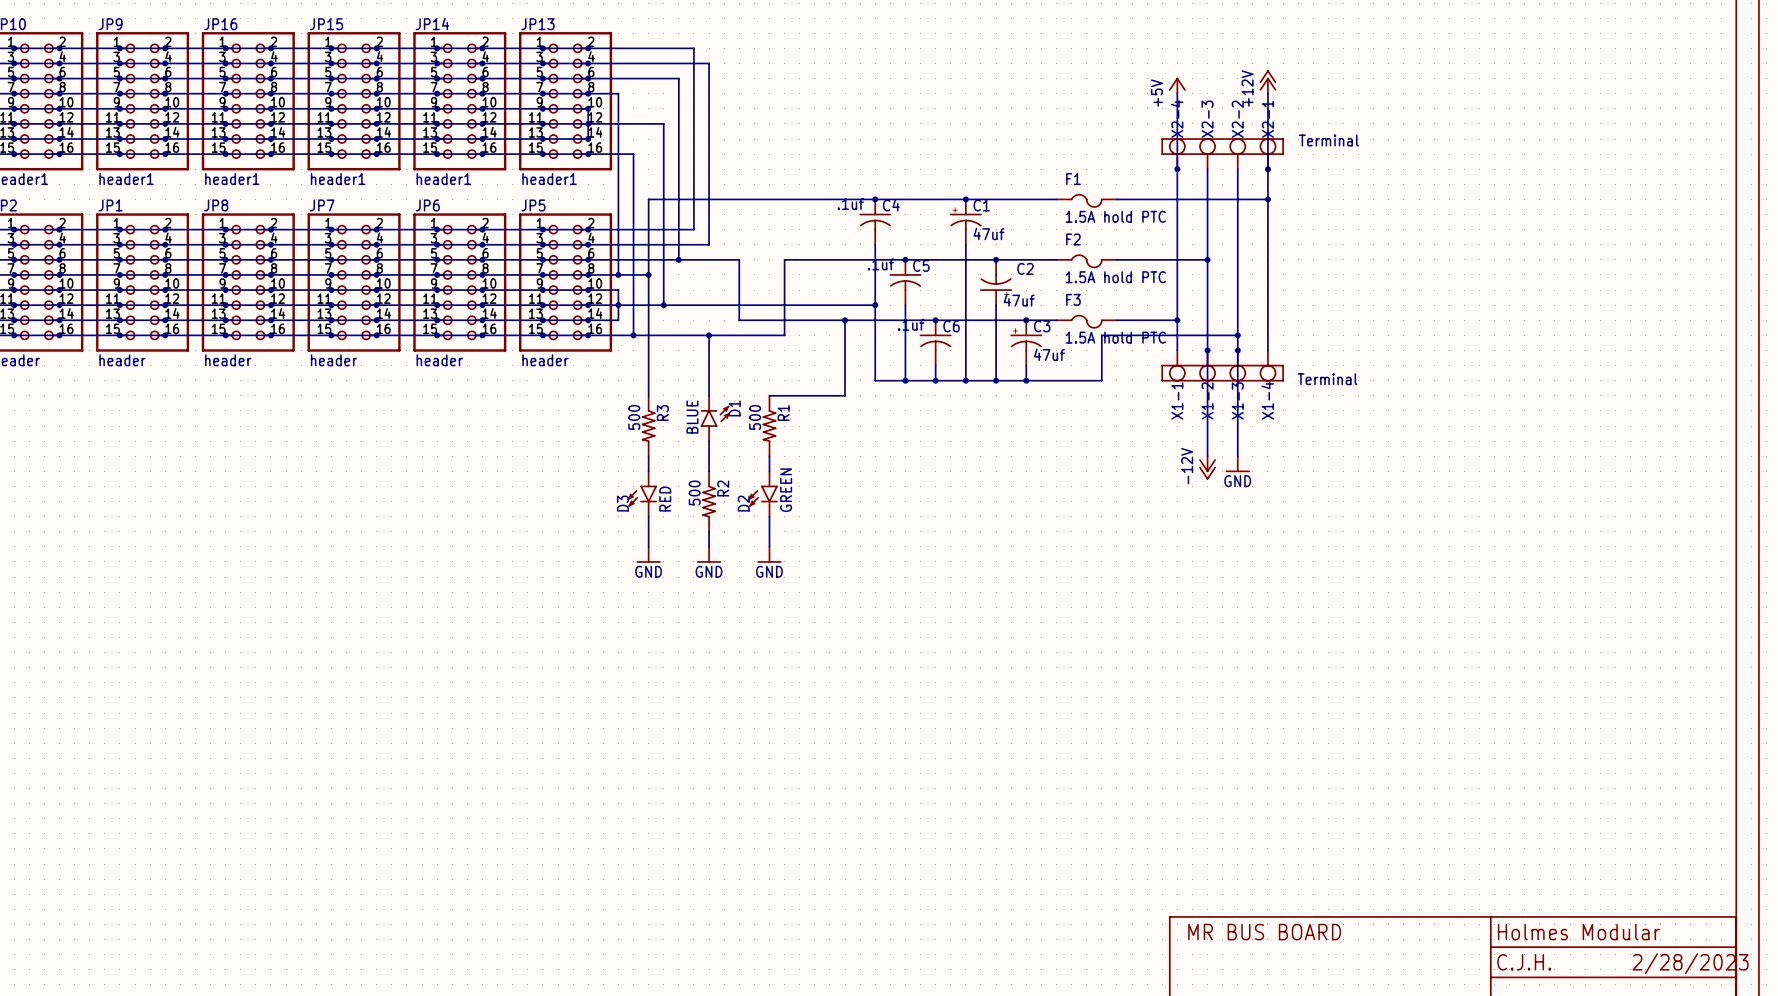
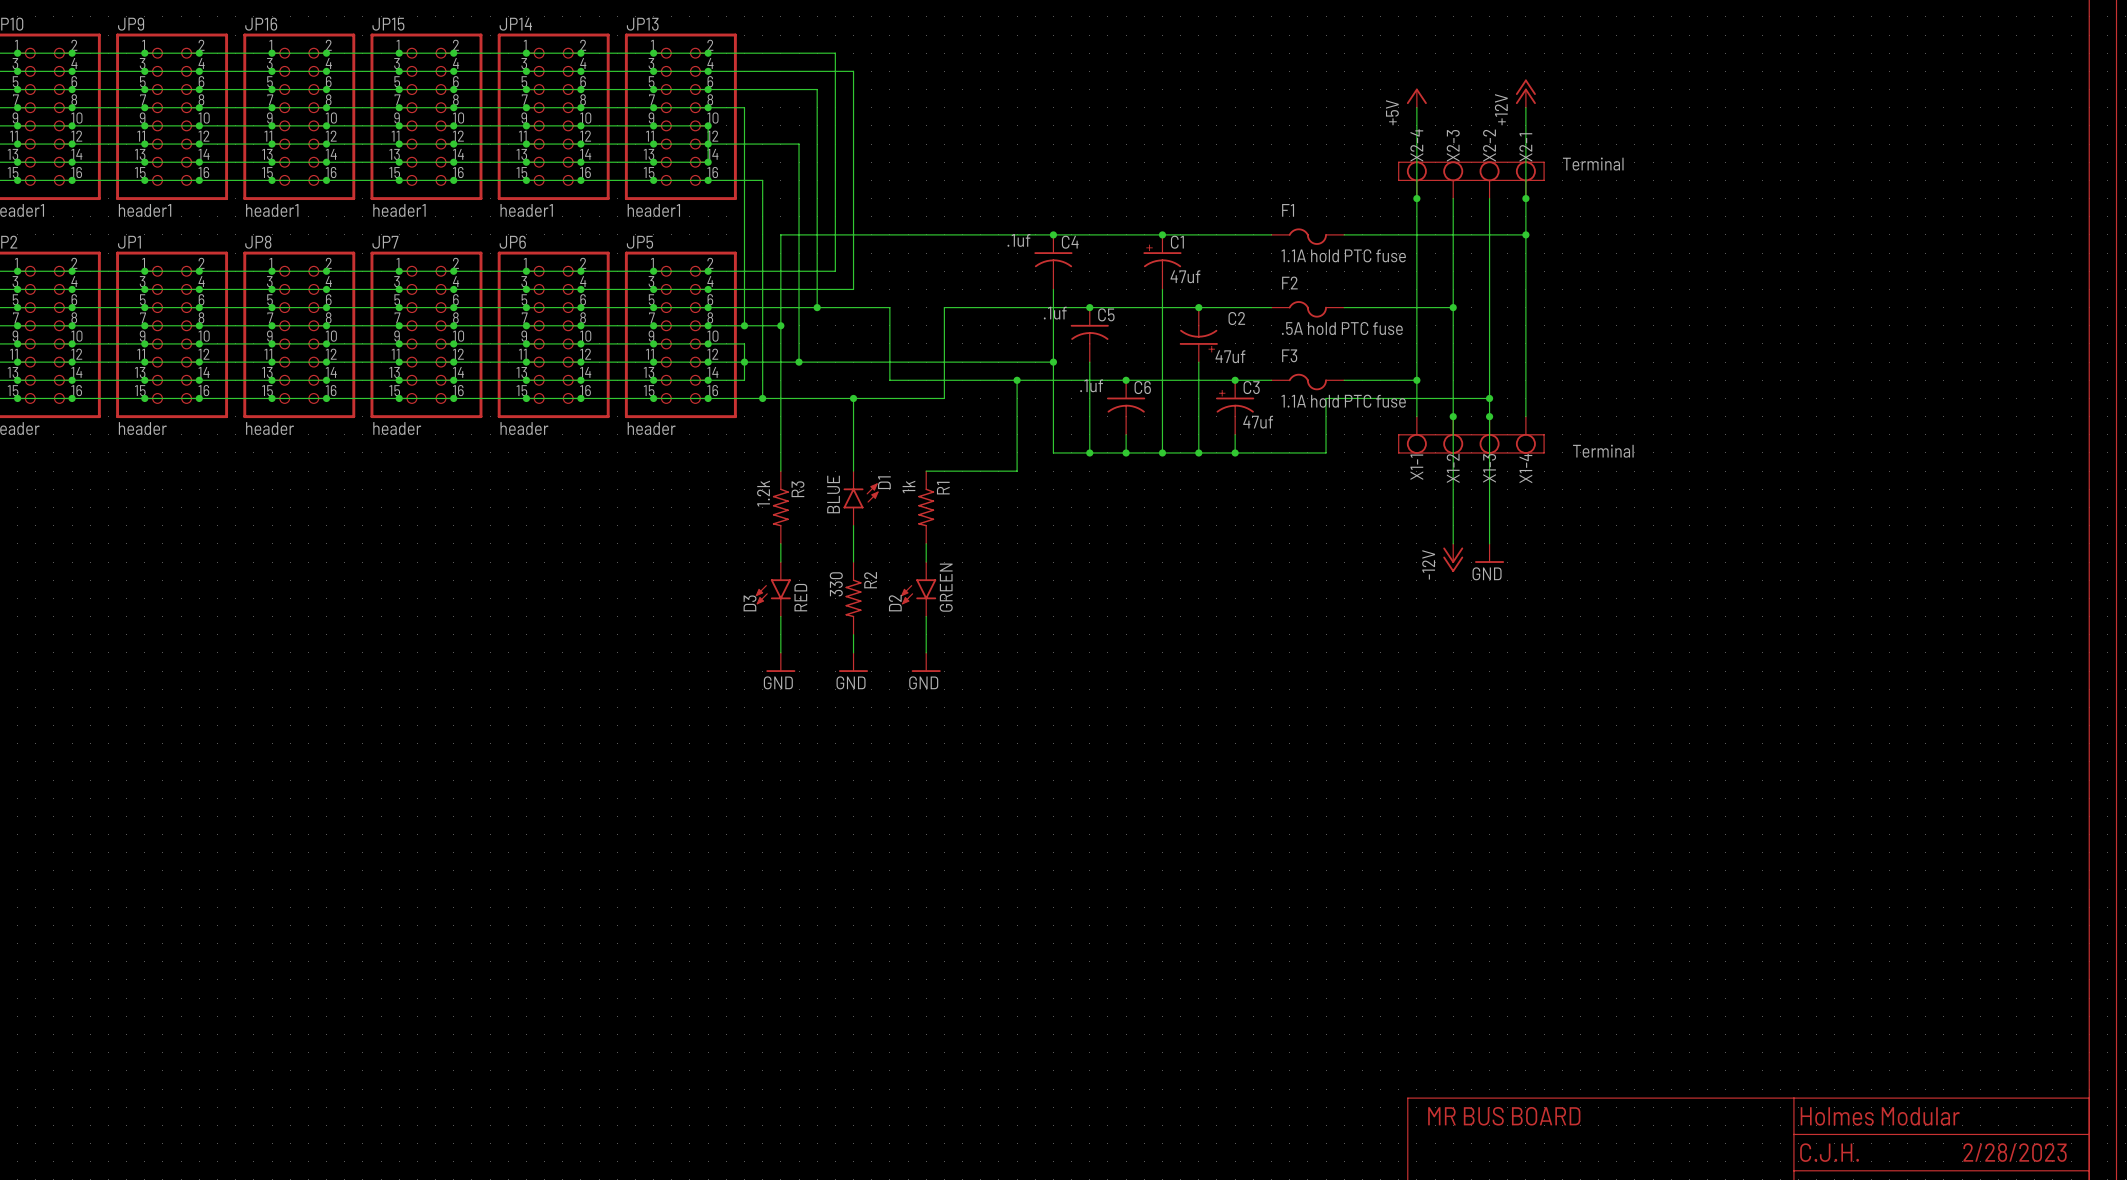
F1 value: 1.5A hold PTC (1115, 216) -> 1.1A hold PTC fuse (1343, 255)
F2 value: 1.5A hold PTC (1115, 277) -> .5A hold PTC fuse (1342, 328)
F3 value: 1.5A hold PTC (1115, 337) -> 1.1A hold PTC fuse (1343, 401)
R3 value: 500 (634, 417) -> 1.2k (763, 493)
R1 value: 500 (755, 417) -> 1k (908, 486)
R2 value: 500 (694, 493) -> 330 (836, 584)

